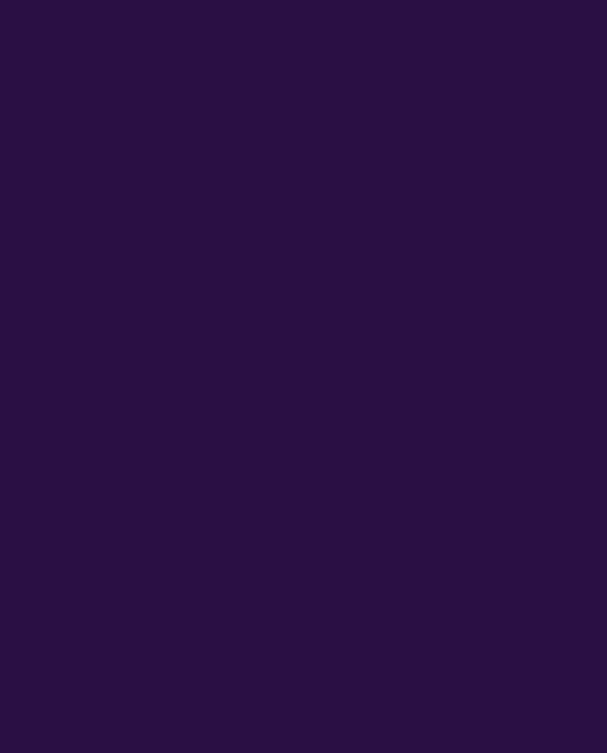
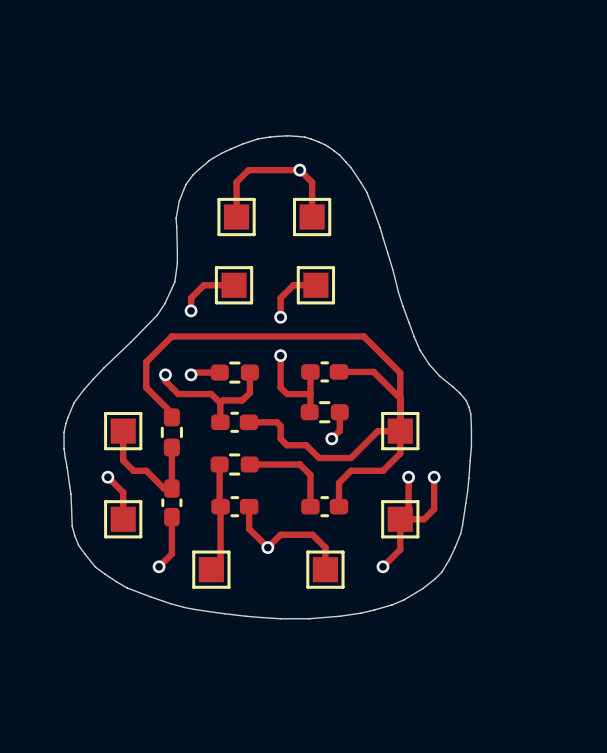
board edge: none -> (287, 135) (257, 138) (221, 153) (199, 169) (186, 184) (179, 201) (176, 218) (177, 263) (174, 281) (164, 303) (157, 315) (103, 368) (74, 402) (65, 423) (64, 448) (74, 535) (84, 553) (95, 567) (104, 574) (126, 587) (184, 607) (246, 616) (308, 618) (361, 613) (392, 604) (422, 588) (441, 572) (455, 547) (462, 524) (468, 478) (471, 427) (470, 414) (466, 400) (439, 376) (419, 349) (402, 305) (380, 227) (366, 192) (361, 183) (339, 155) (327, 146) (304, 137) (287, 135)
via: none -> (299, 170)
track: none -> (236, 217) (236, 182) (248, 170) (299, 170) (312, 182) (312, 217)
part: none -> (236, 217)
part: none -> (312, 217)
track: none -> (234, 285) (203, 285) (191, 298) (191, 310)
part: none -> (234, 285)
track: none -> (315, 285) (293, 285) (280, 298) (280, 317)
part: none -> (315, 285)
via: none -> (191, 310)
via: none -> (280, 317)
track: none -> (280, 355) (280, 387) (287, 394) (310, 394)
via: none -> (280, 355)
track: none -> (310, 371) (309, 412)
part: none -> (324, 371)
track: none -> (339, 371) (373, 371) (400, 398)
track: none -> (219, 372) (189, 372) (191, 374)
part: none -> (234, 372)
track: none -> (249, 372) (249, 392) (242, 400) (223, 400) (220, 403)
track: none -> (165, 374) (165, 381) (178, 394) (211, 394) (220, 403)
via: none -> (165, 374)
via: none -> (191, 374)
track: none -> (220, 403) (220, 422)
part: none -> (324, 412)
track: none -> (339, 412) (339, 430) (331, 438)
track: none -> (171, 417) (171, 413) (146, 387) (146, 362) (171, 336) (363, 336) (400, 372) (400, 453) (383, 470) (351, 470) (339, 482) (339, 506)
part: none -> (234, 422)
track: none -> (248, 422) (276, 422) (280, 426) (280, 438) (287, 445) (306, 445) (319, 458) (351, 458) (377, 431) (400, 431)
track: none -> (123, 431) (123, 460) (133, 470) (146, 470) (163, 488) (171, 488) (171, 447)
part: none -> (123, 431)
part: none -> (400, 431)
part: none -> (171, 432)
via: none -> (331, 438)
track: none -> (219, 464) (220, 560) (211, 569)
part: none -> (234, 464)
track: none -> (249, 464) (299, 464)
track: none -> (299, 464) (310, 475) (310, 506)
track: none -> (107, 477) (123, 492) (123, 519)
via: none -> (107, 477)
track: none -> (408, 477) (408, 510) (400, 519)
via: none -> (408, 477)
track: none -> (434, 477) (434, 509) (424, 519) (400, 519)
via: none -> (434, 477)
part: none -> (171, 502)
part: none -> (234, 506)
track: none -> (249, 506) (249, 528) (267, 547) (280, 534) (312, 534) (325, 547) (325, 569)
part: none -> (324, 506)
track: none -> (171, 517) (171, 553) (159, 566)
part: none -> (123, 519)
track: none -> (400, 519) (400, 549) (383, 566)
part: none -> (400, 519)
via: none -> (267, 547)
via: none -> (159, 566)
via: none -> (383, 566)
part: none -> (211, 569)
part: none -> (325, 569)

